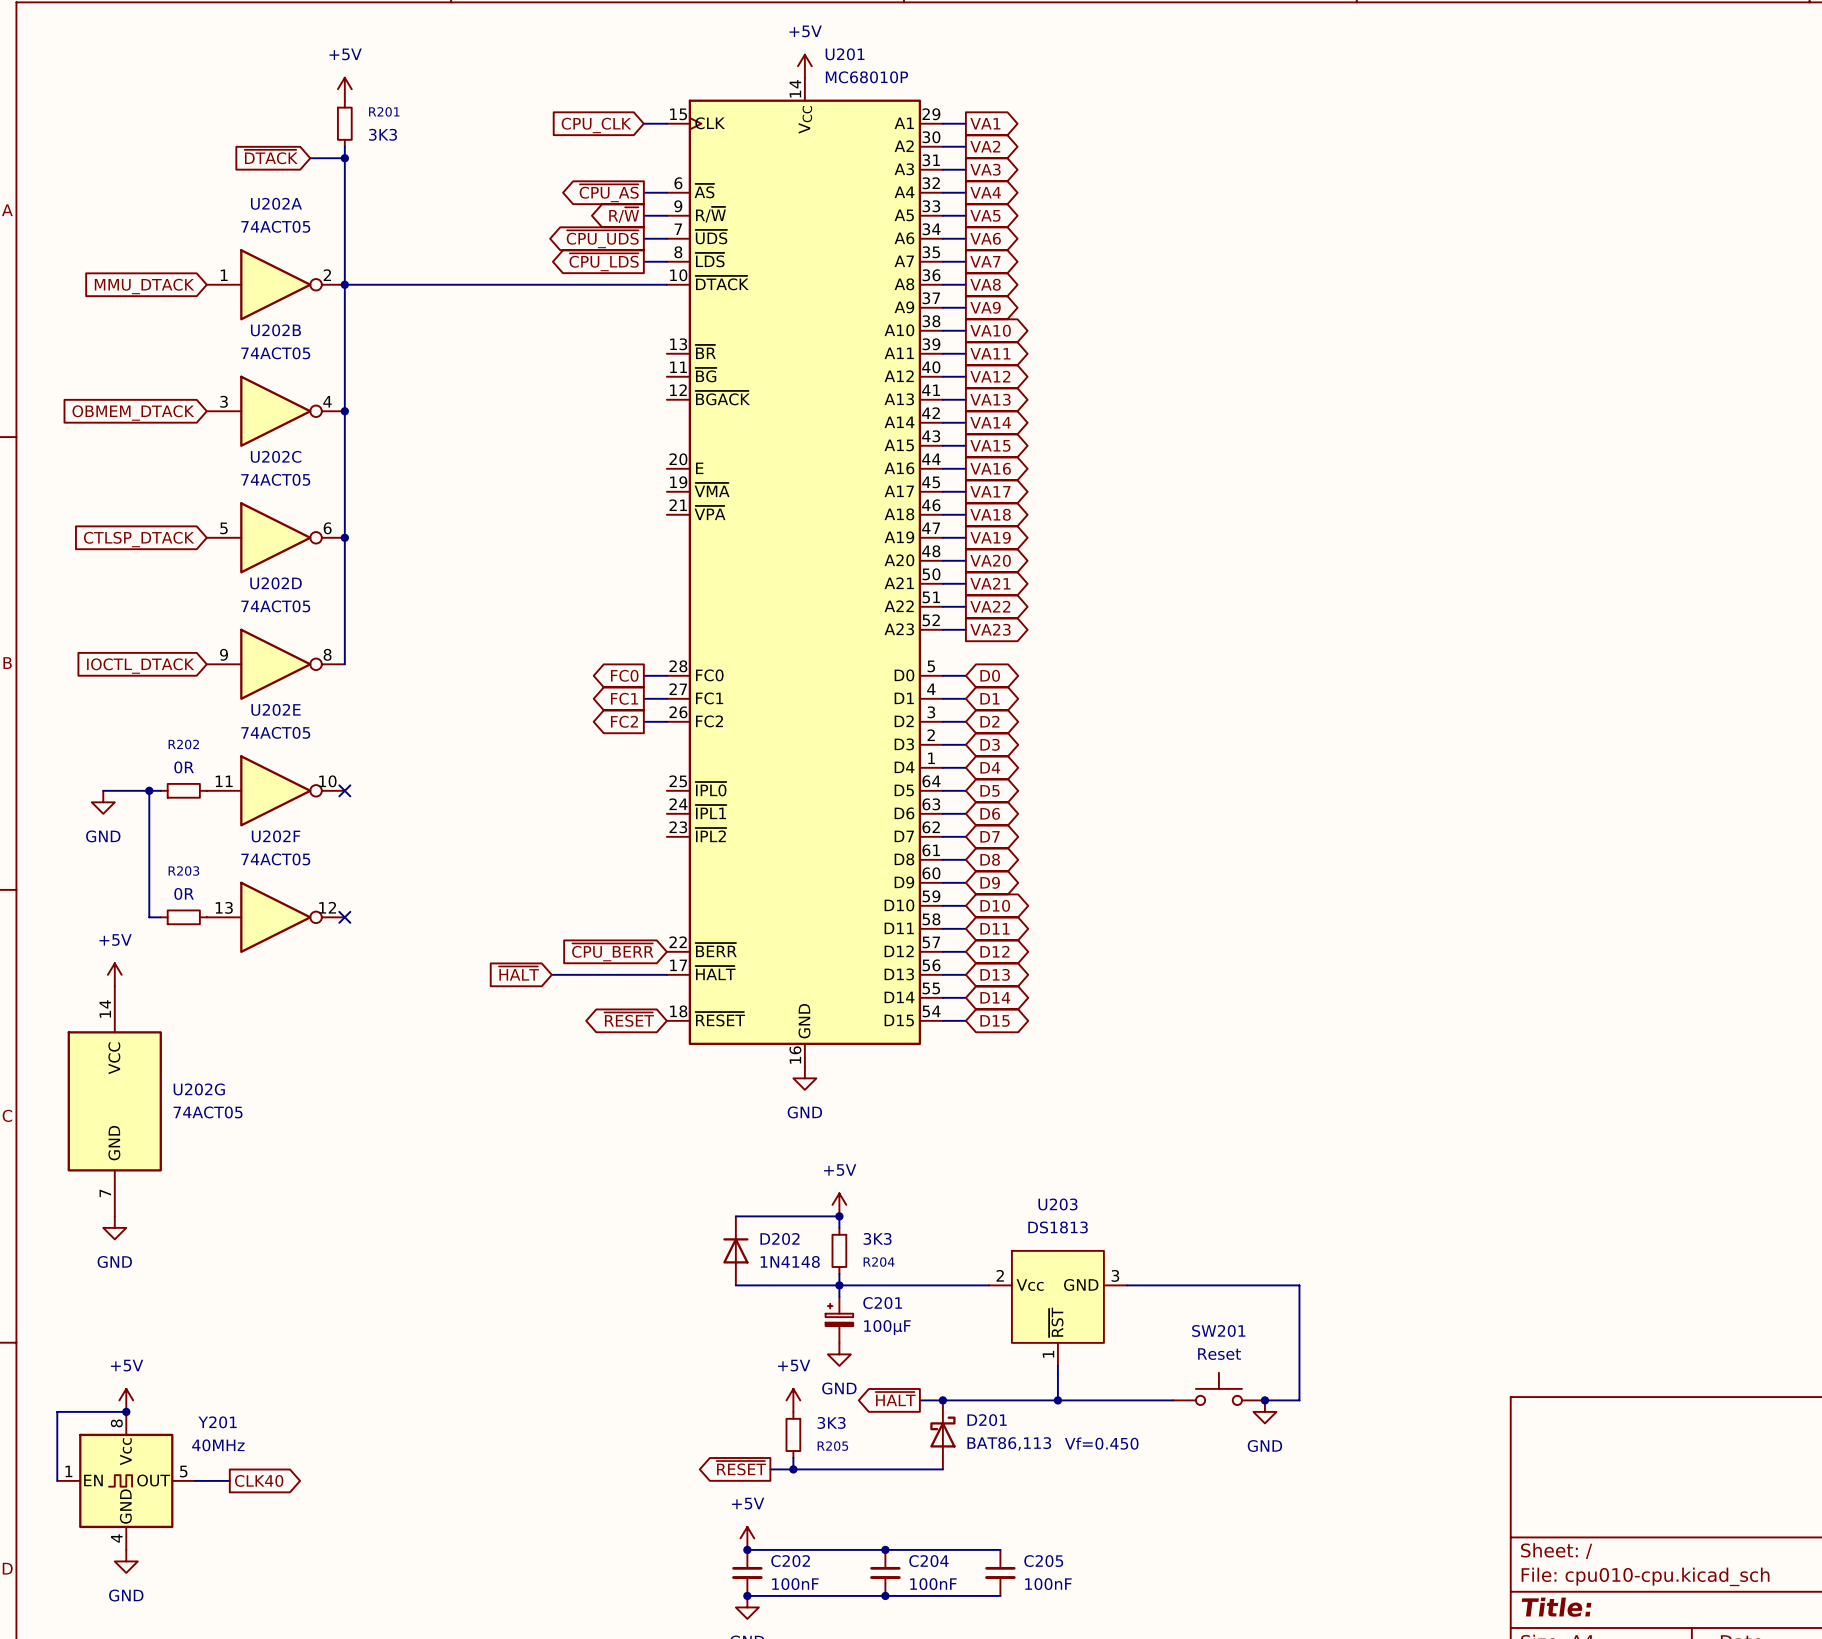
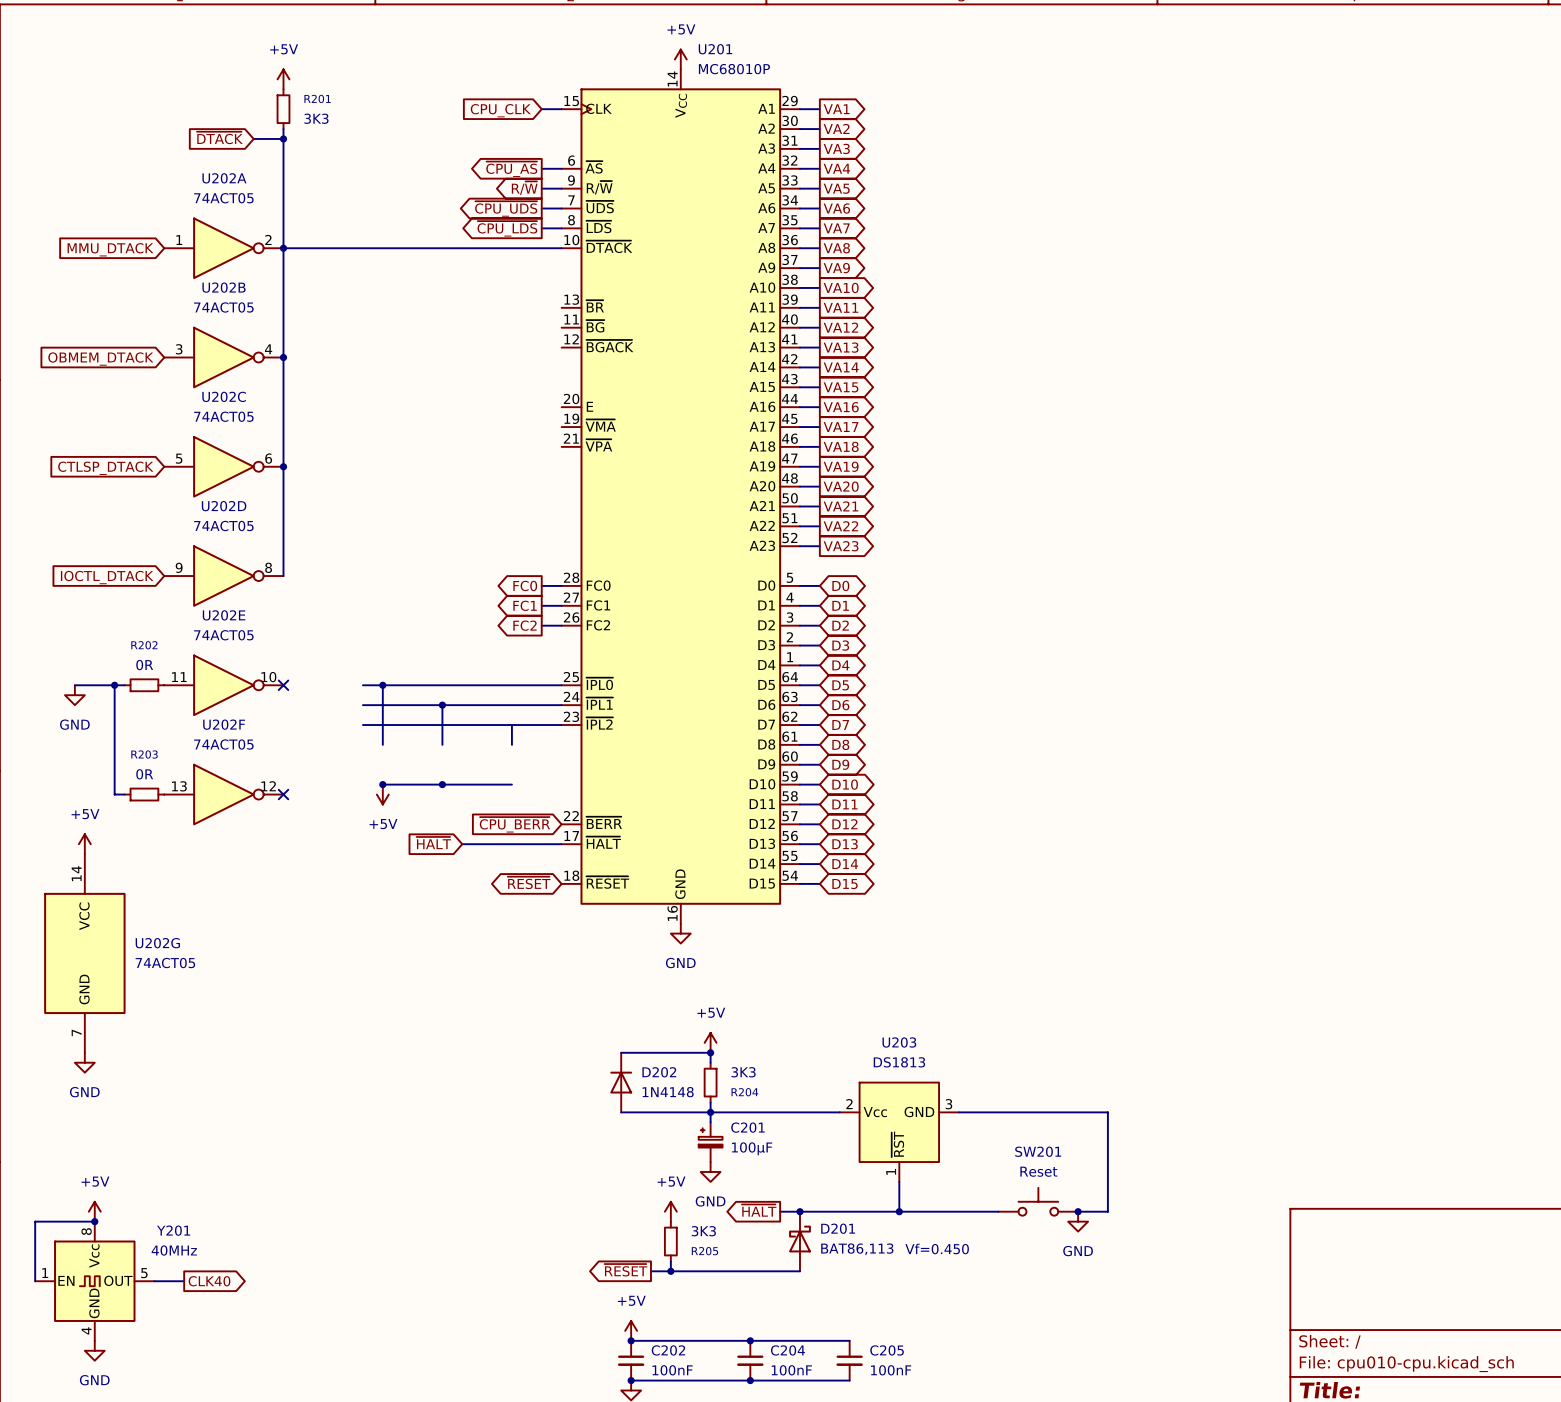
wire: none -> (362, 685) (561, 685)
wire: none -> (382, 685) (382, 744)
junction: none -> (382, 685)
wire: none -> (362, 705) (561, 705)
wire: none -> (442, 705) (442, 744)
junction: none -> (442, 705)
wire: none -> (362, 725) (561, 725)
wire: none -> (511, 725) (511, 744)
wire: none -> (382, 784) (511, 784)
junction: none -> (382, 784)
junction: none -> (442, 784)
power symbol: none -> +5V (382, 794)

